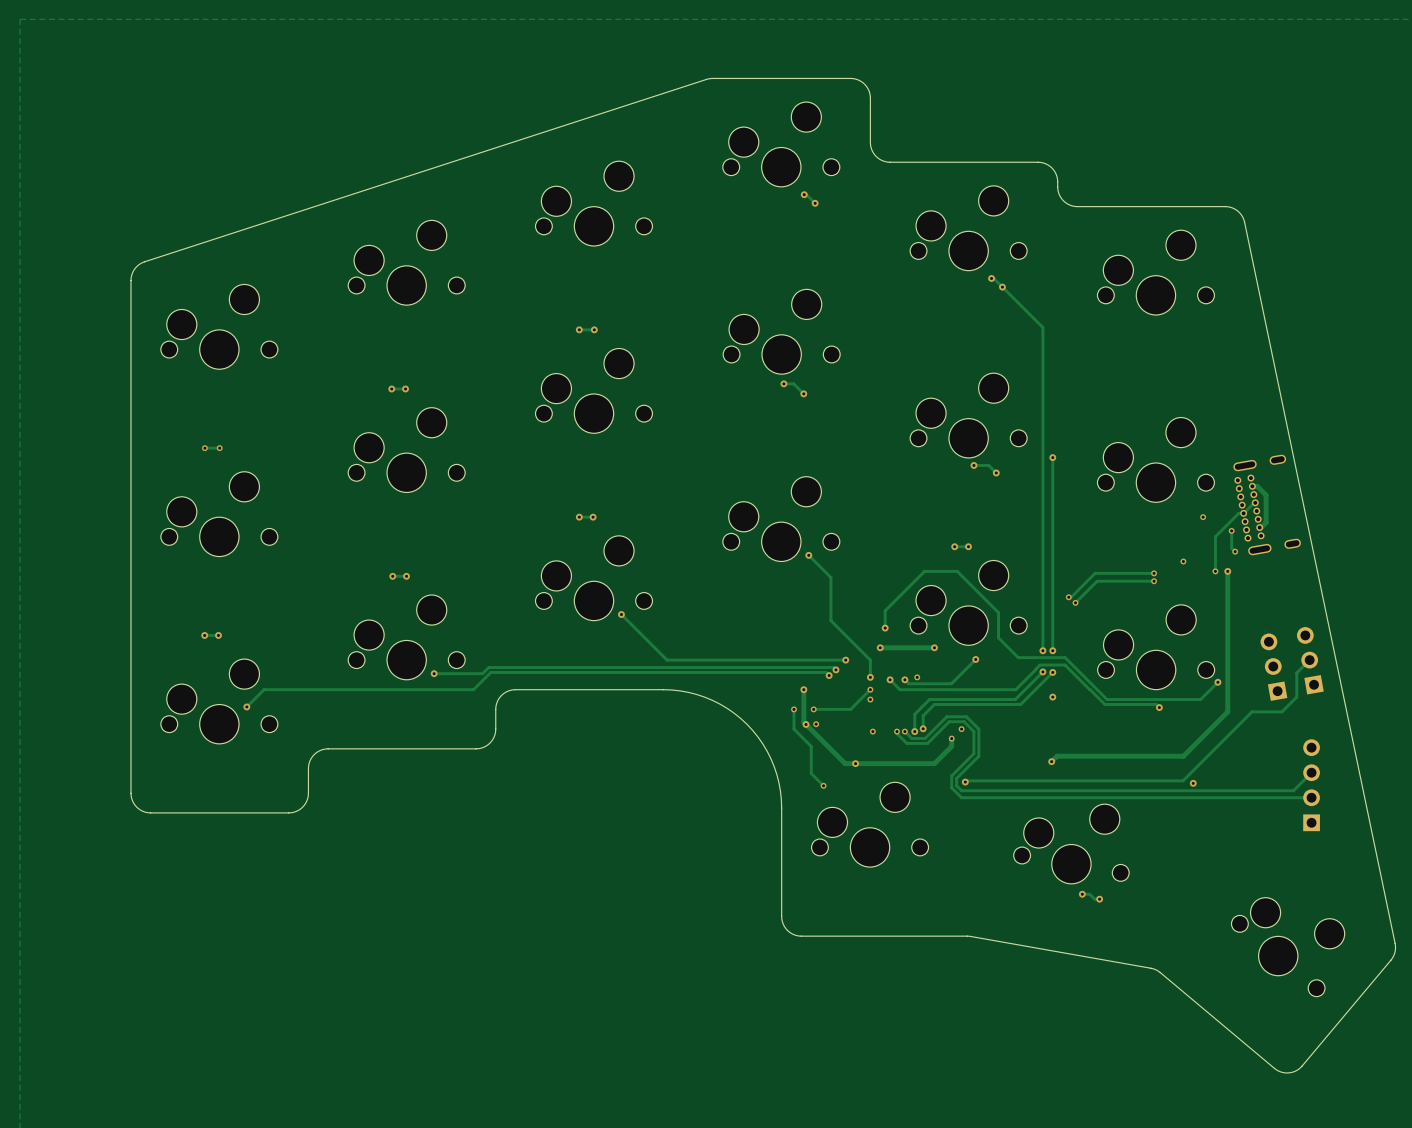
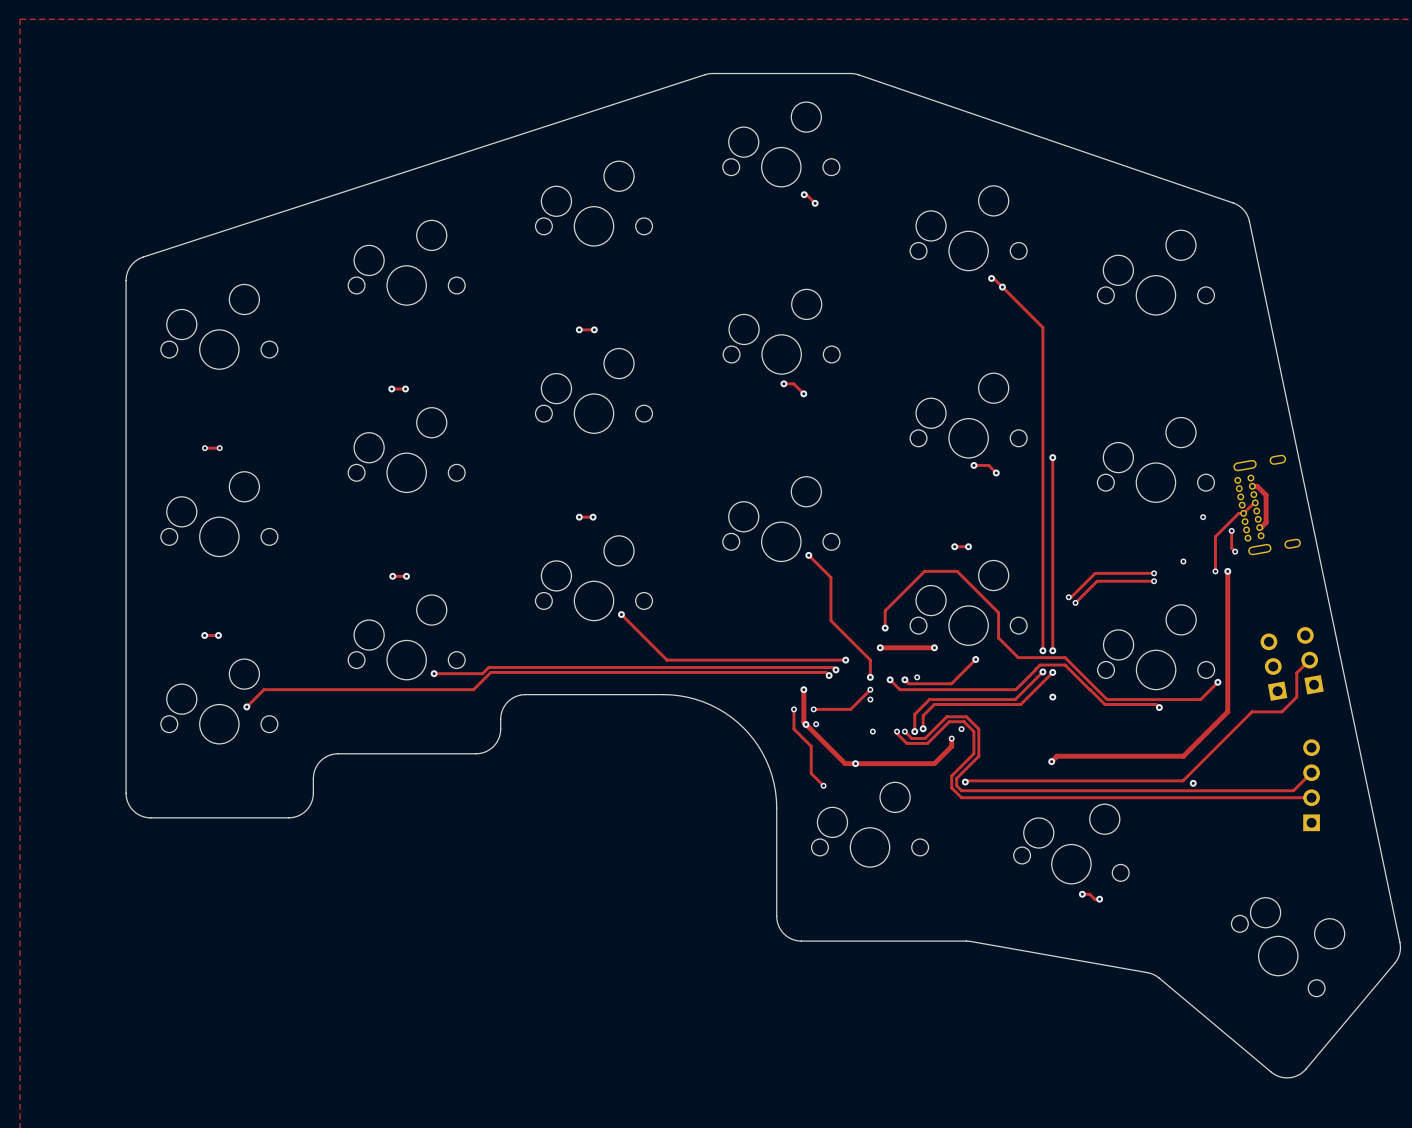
board edge: (712, 78) (850, 78) (859, 80) (866, 85) (869, 93) (871, 149) (877, 157) (885, 161) (1040, 162) (1053, 169) (1057, 177) (1059, 195) (1065, 202) (1073, 206) (1227, 206) (1235, 209) (1242, 216) (1395, 945) (1390, 960) (1297, 1070) (1286, 1072) (1276, 1069) (1153, 968) (968, 936) (801, 936) (790, 933) (784, 926) (781, 918) (781, 799) (776, 774) (770, 758) (758, 737) (740, 718) (720, 704) (688, 692) (663, 689) (508, 690) (501, 695) (496, 702) (493, 737) (482, 747) (328, 748) (317, 751) (308, 764) (307, 799) (301, 808) (293, 812) (150, 812) (142, 810) (134, 803) (130, 793) (130, 280) (134, 268) (144, 261) (712, 78) -> (712, 73) (143, 257) (130, 266) (126, 280) (126, 793) (129, 805) (138, 814) (147, 817) (294, 817) (304, 812) (310, 803) (314, 772) (318, 763) (325, 757) (338, 753) (484, 752) (493, 746) (498, 739) (503, 706) (510, 699) (518, 695) (663, 694) (687, 697) (710, 704) (731, 717) (754, 740) (766, 760) (772, 776) (776, 799) (776, 919) (780, 928) (789, 937) (801, 941) (968, 941) (1150, 973) (1159, 978) (1273, 1073) (1286, 1077) (1299, 1074) (1394, 963) (1399, 953) (1400, 945) (1249, 221) (1245, 212) (1233, 203) (856, 74) (712, 73)

